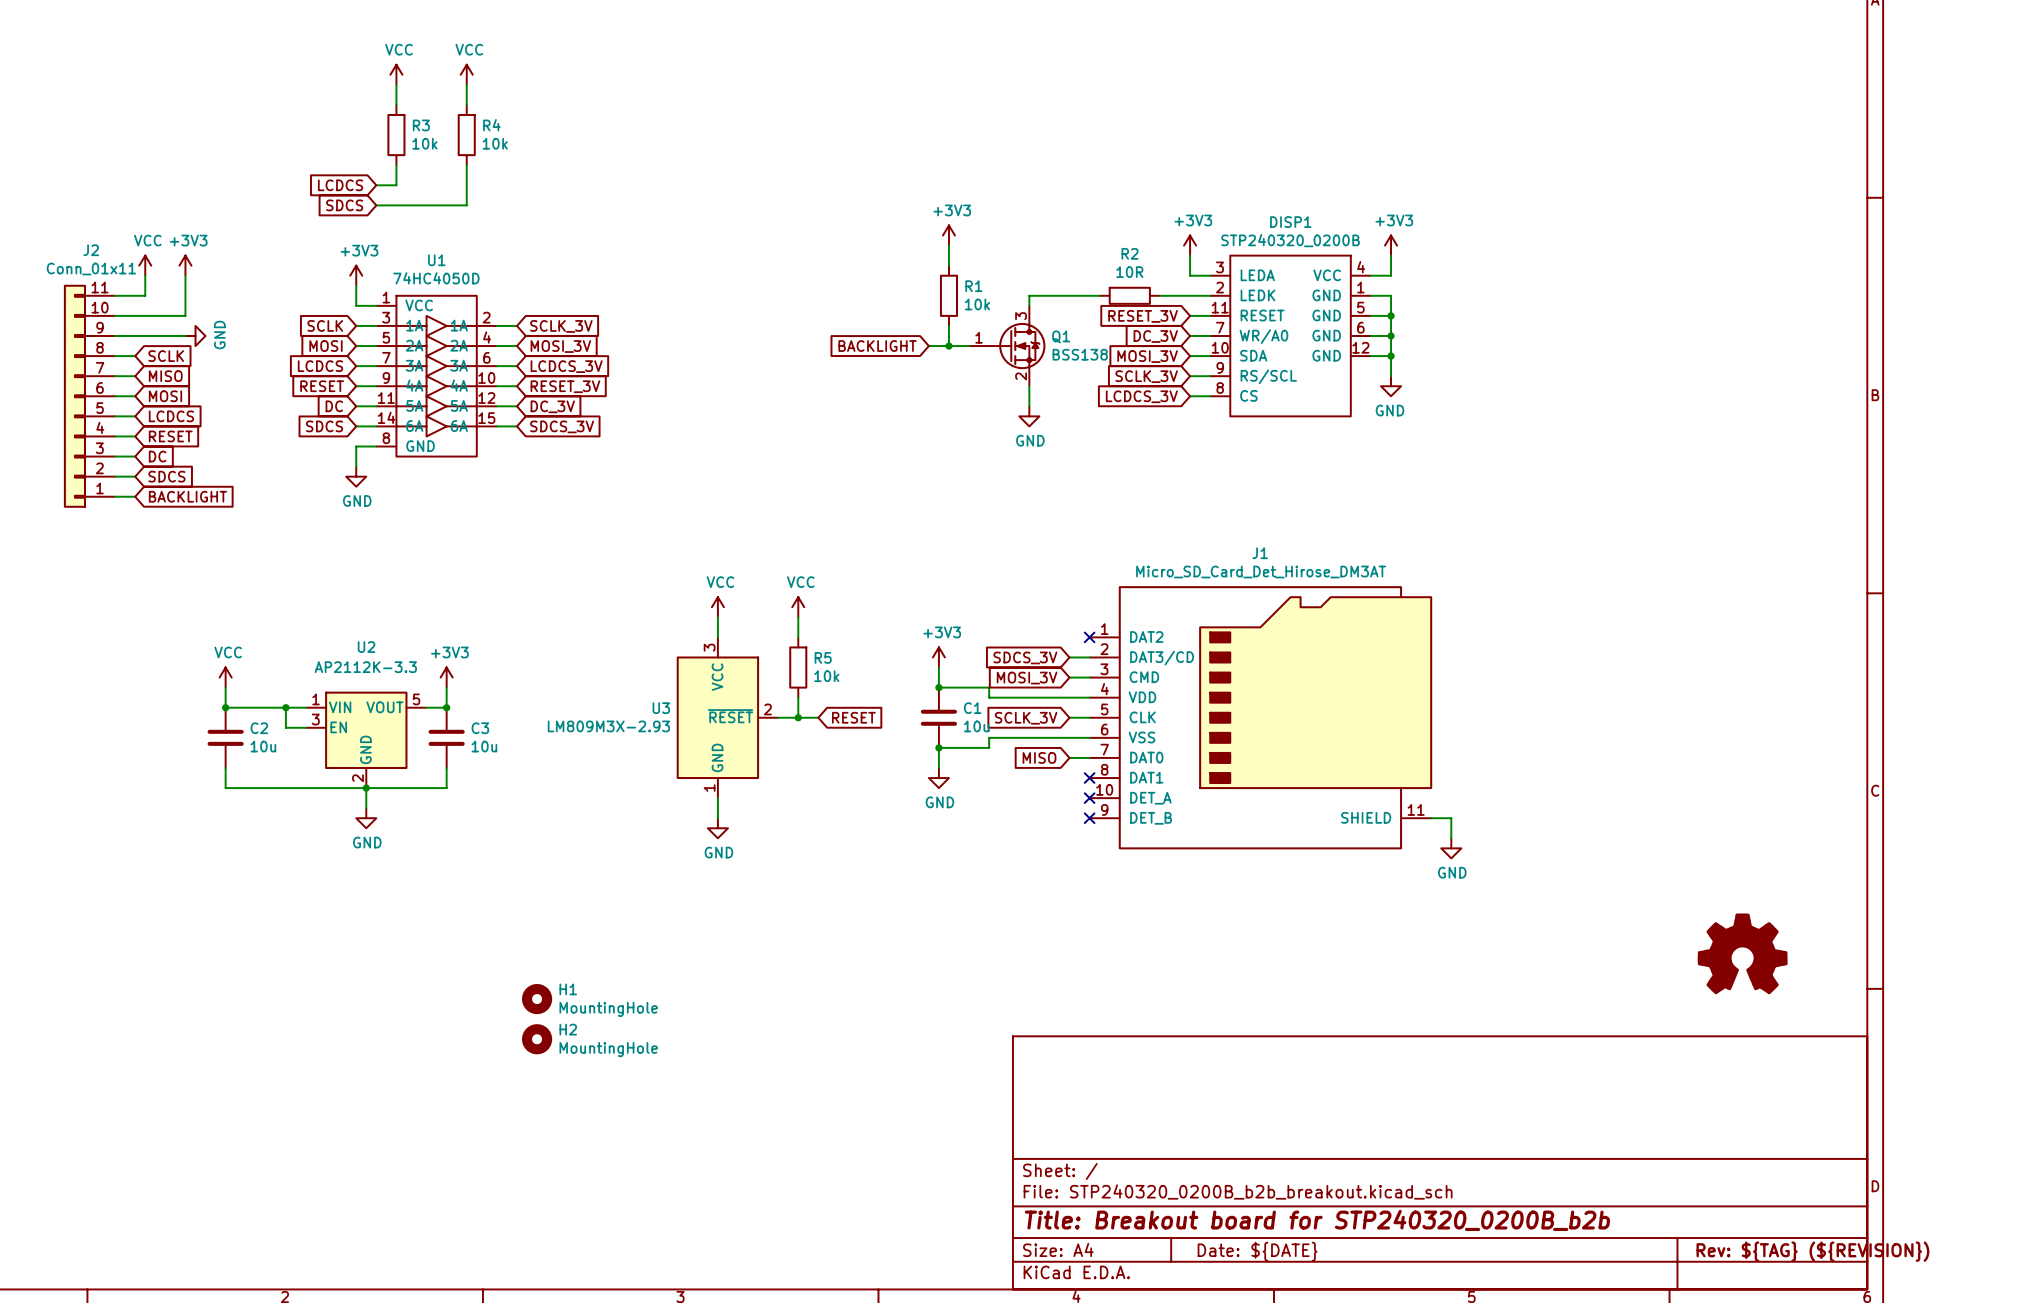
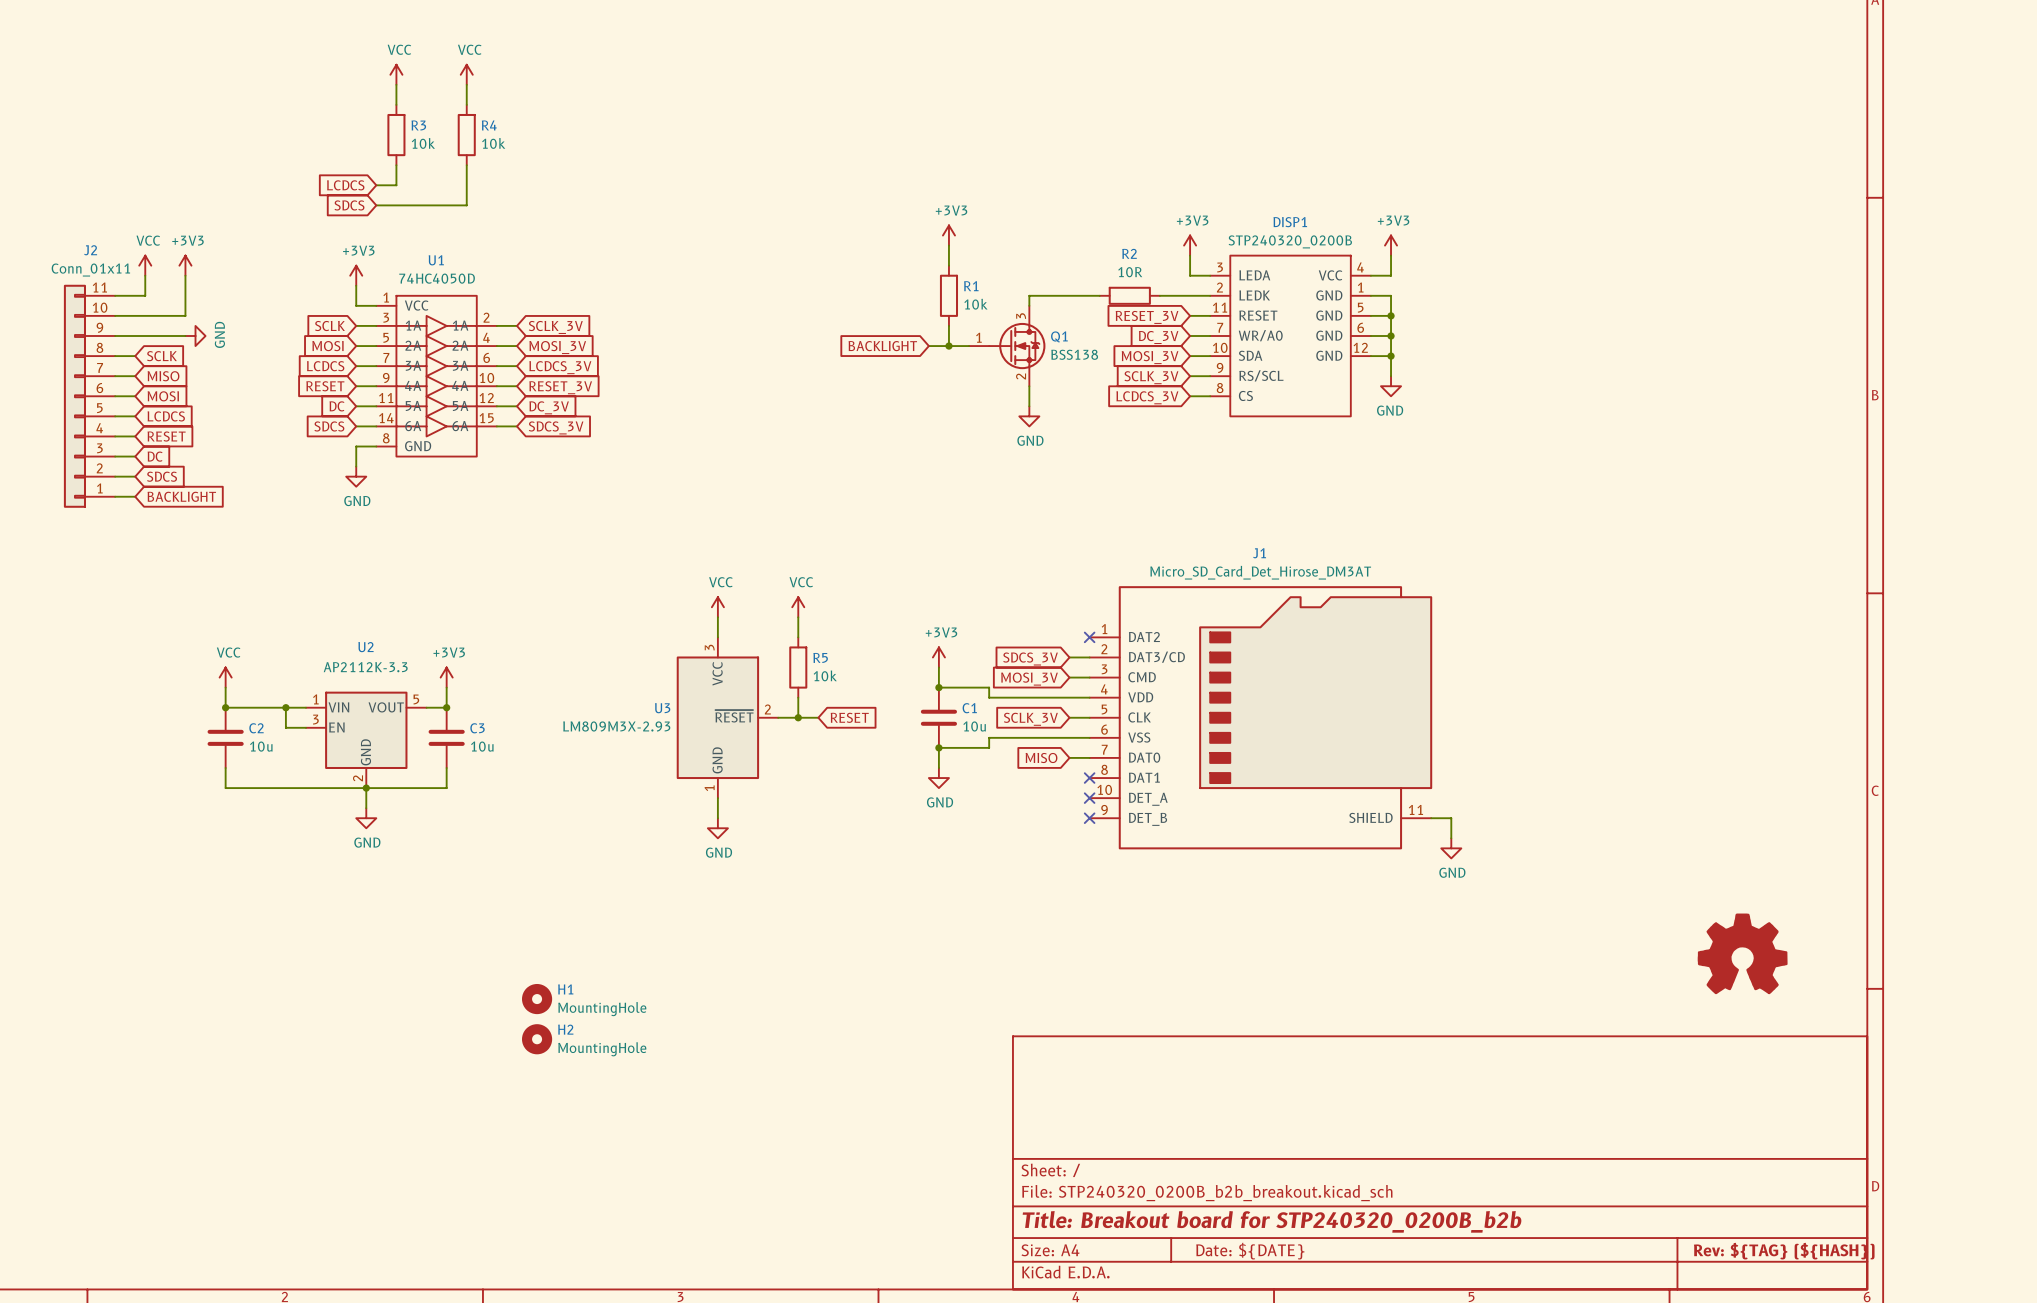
title block: Rev: ${TAG} (${REVISION}) (1812, 1251) -> Rev: ${TAG} (${HASH}) (1784, 1251)

